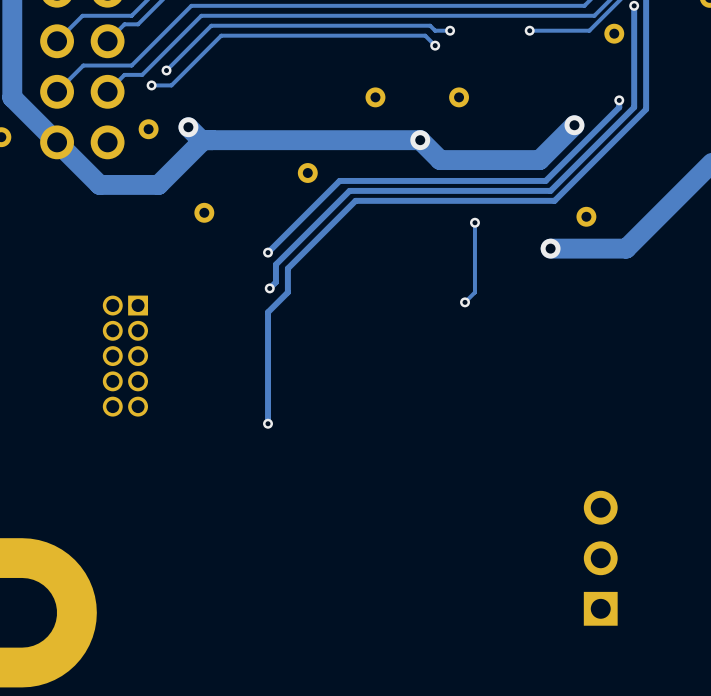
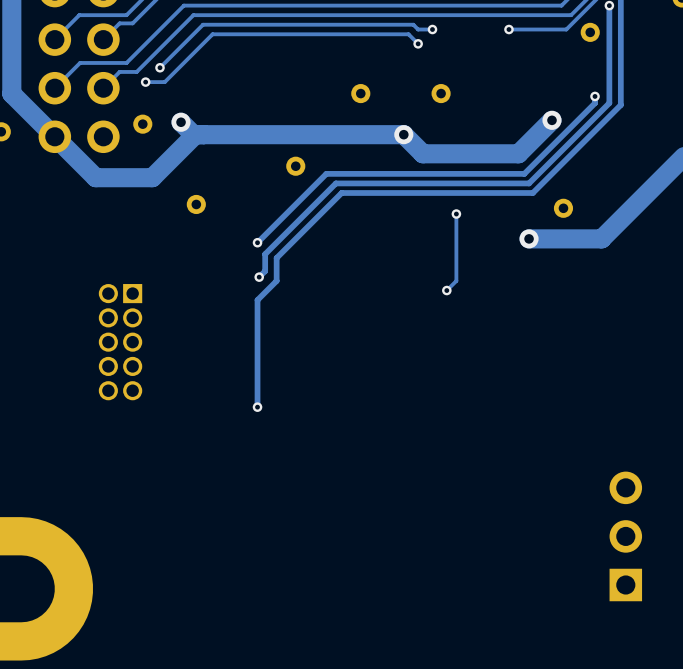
part position: (600, 558) -> (625, 536)

